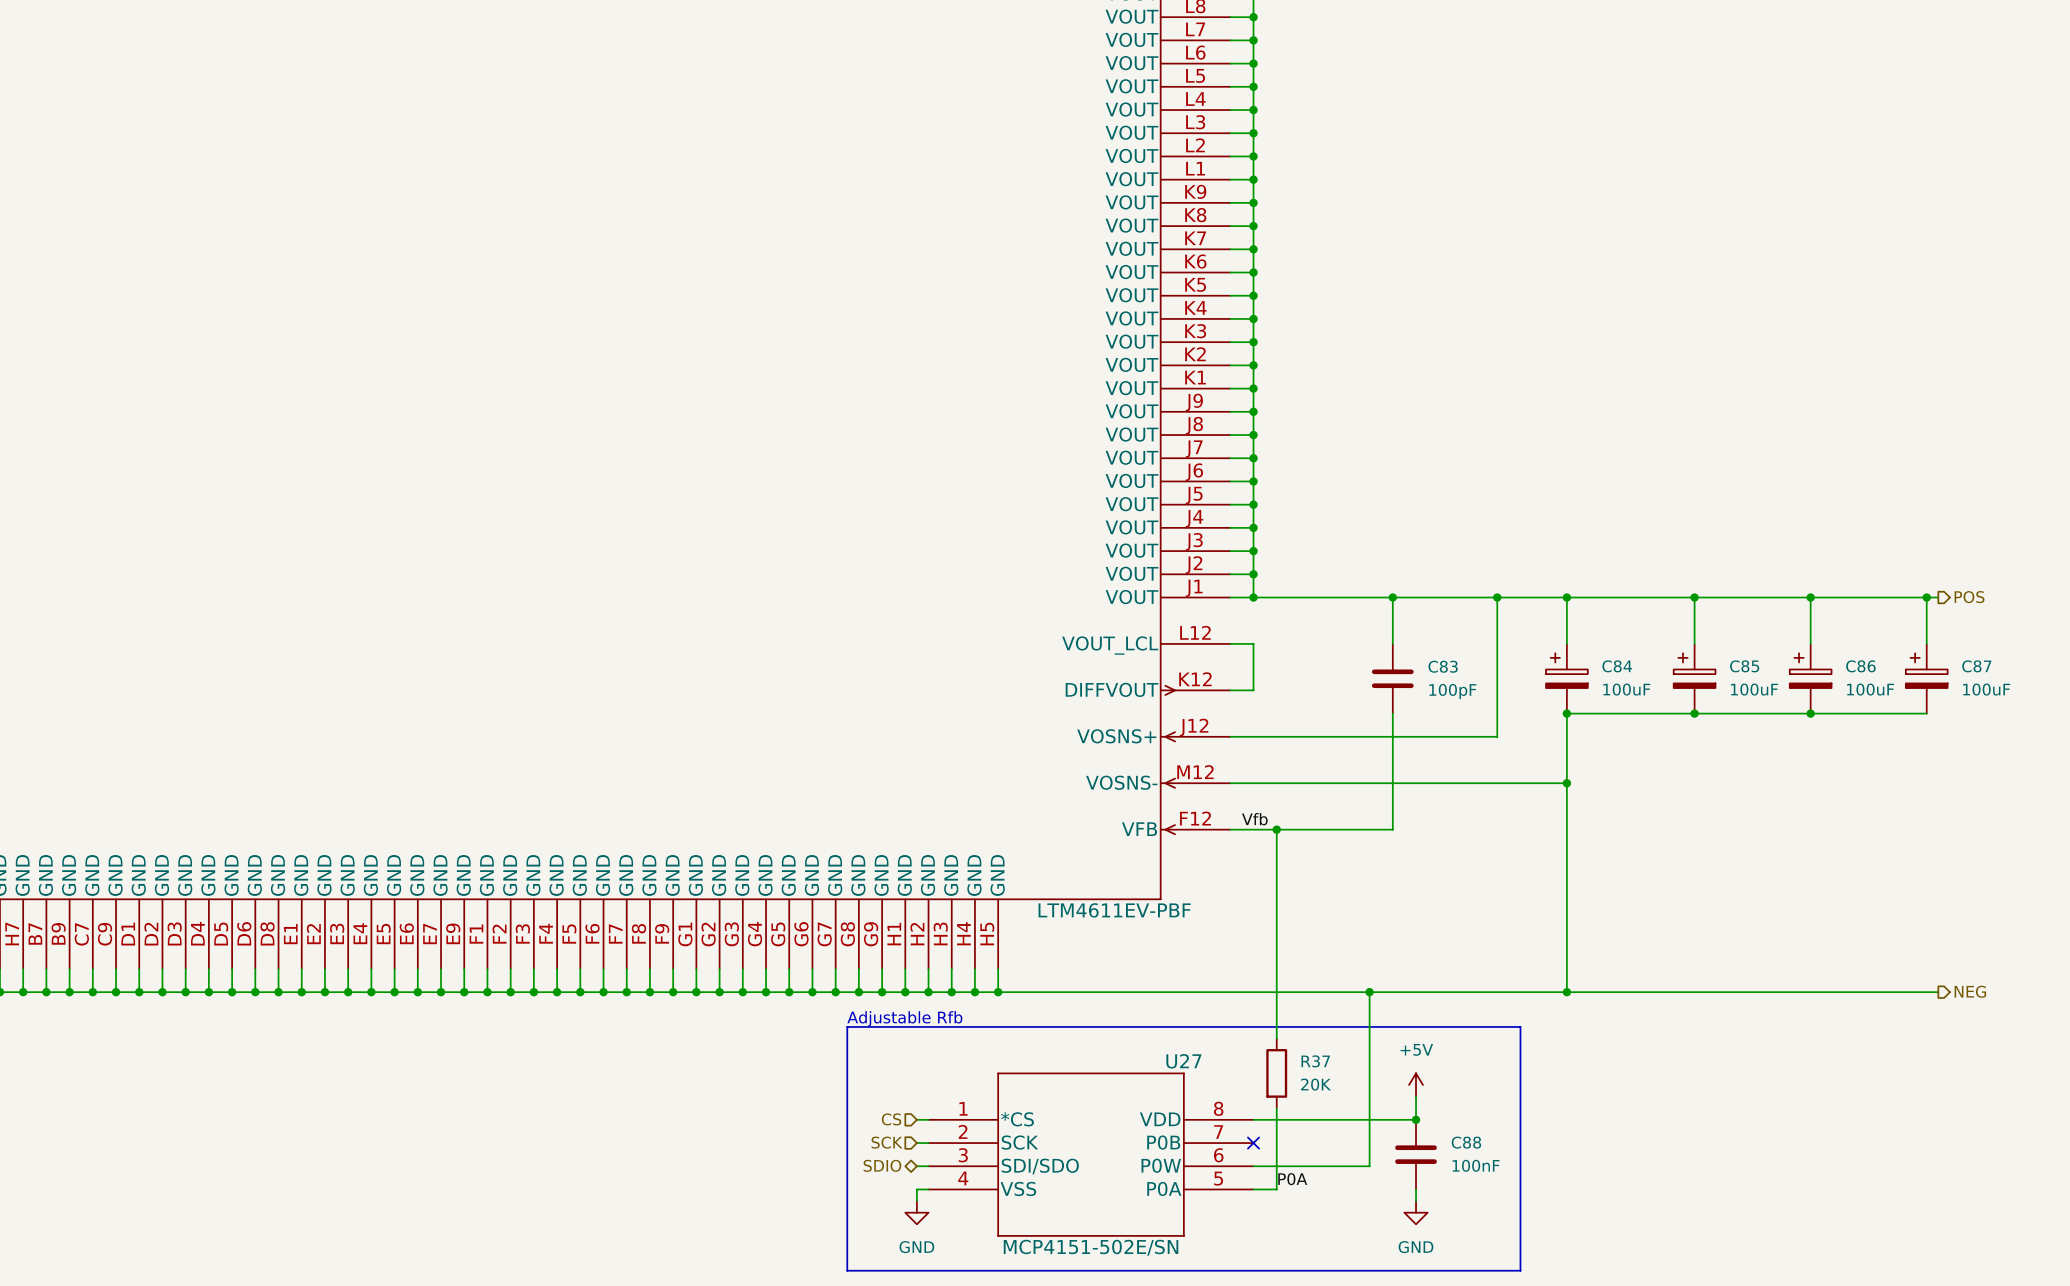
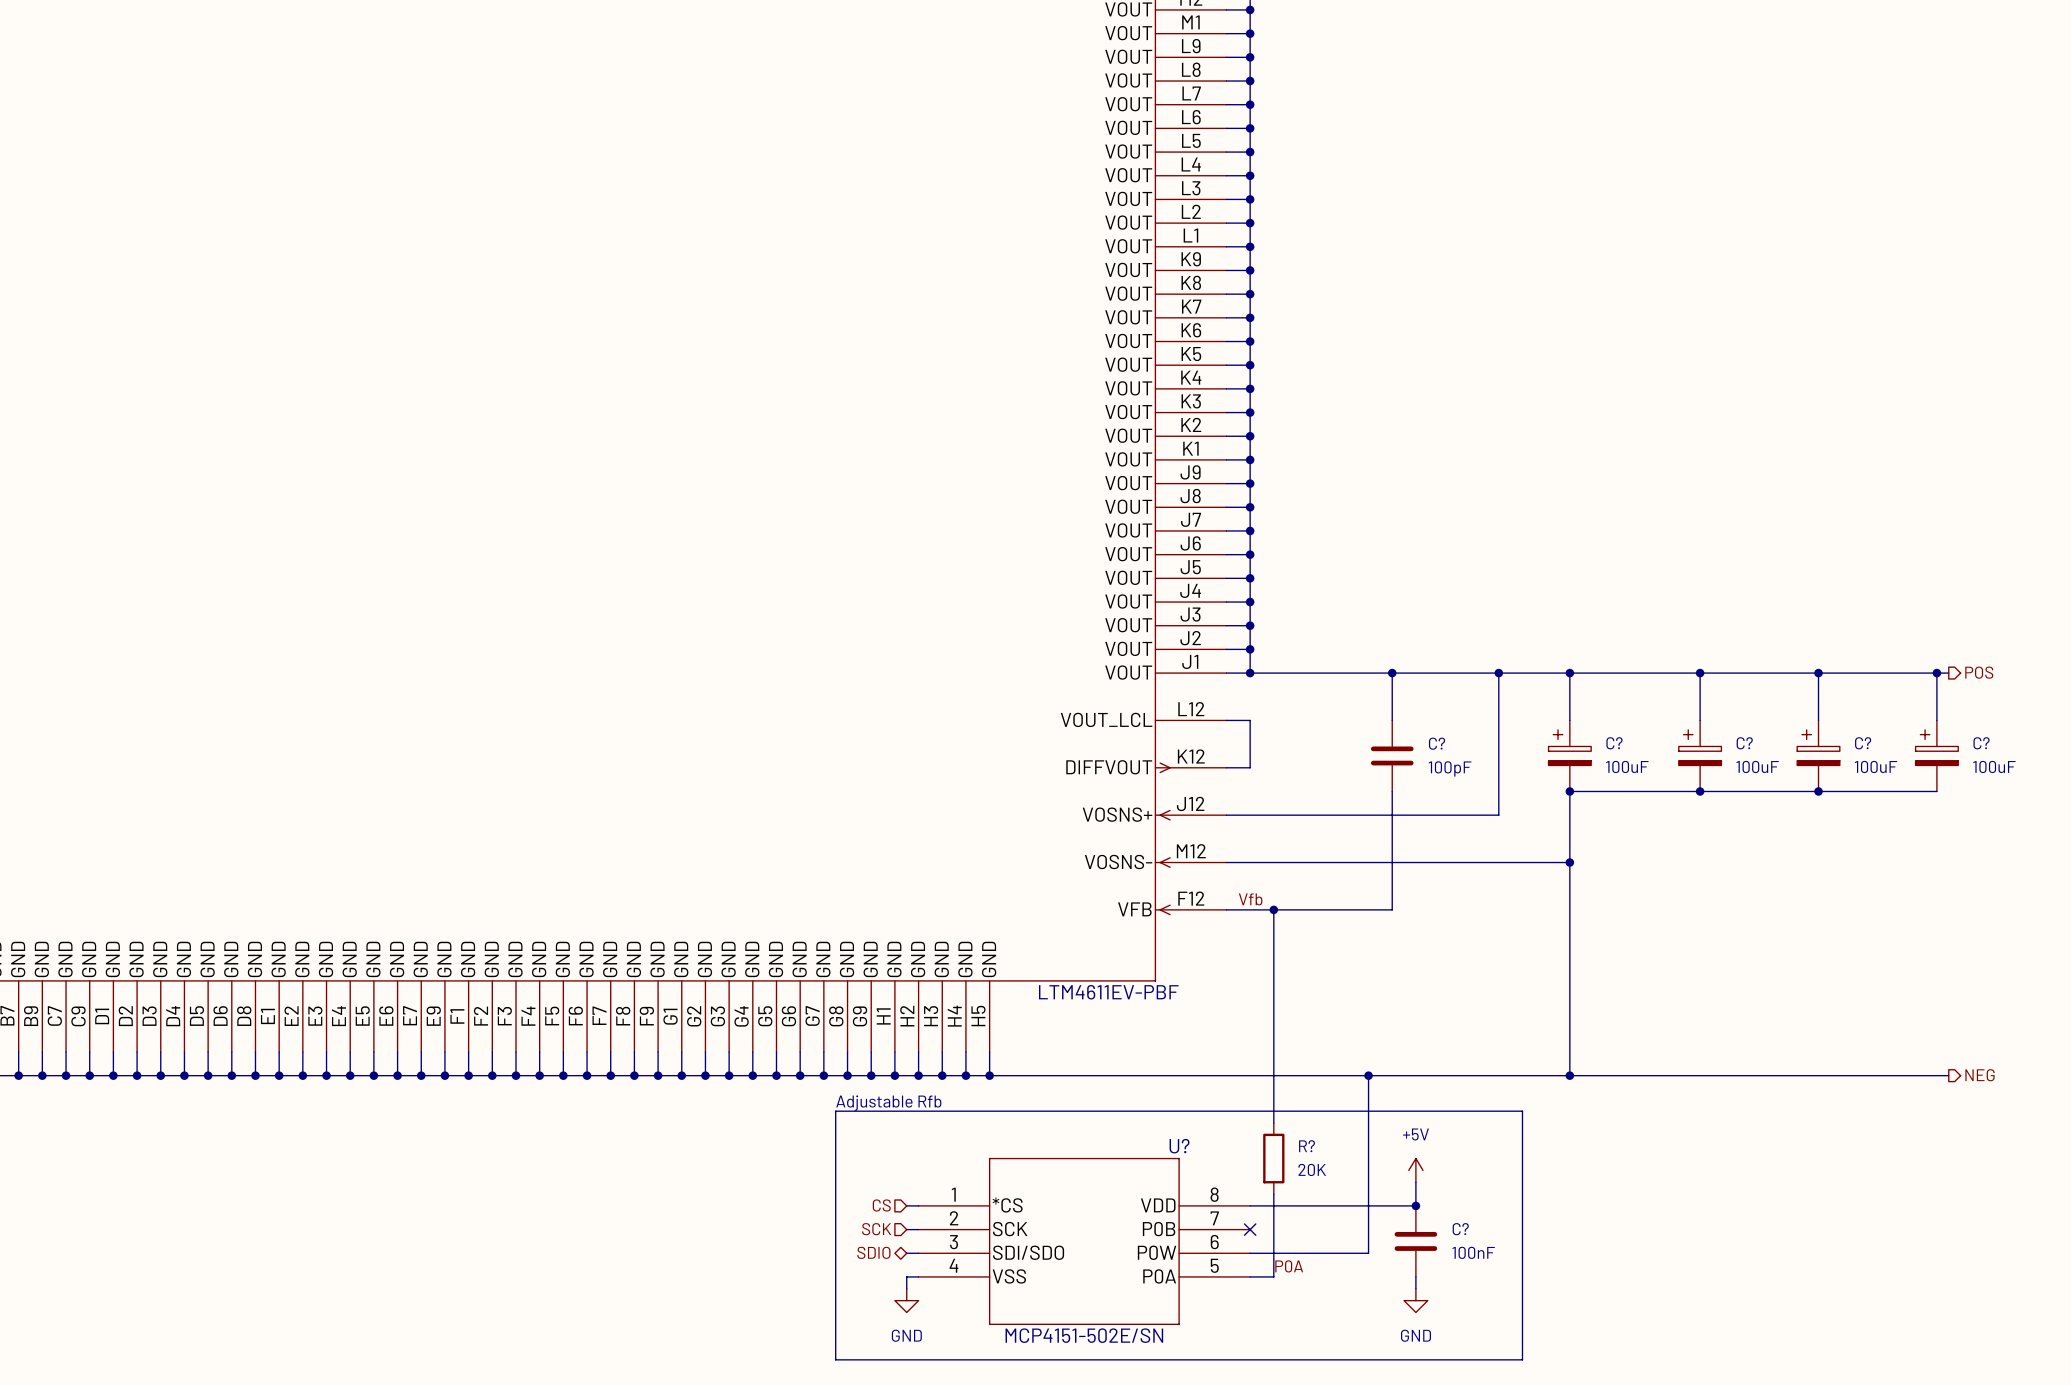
C83 name: C83 (1443, 666) -> C? (1437, 743)
C84 name: C84 (1617, 666) -> C? (1614, 743)
C85 name: C85 (1744, 666) -> C? (1744, 743)
C86 name: C86 (1860, 666) -> C? (1863, 743)
C87 name: C87 (1976, 666) -> C? (1981, 743)
U27 name: U27 (1183, 1061) -> U? (1179, 1146)
R37 name: R37 (1315, 1061) -> R? (1307, 1146)
C88 name: C88 (1466, 1142) -> C? (1460, 1229)

